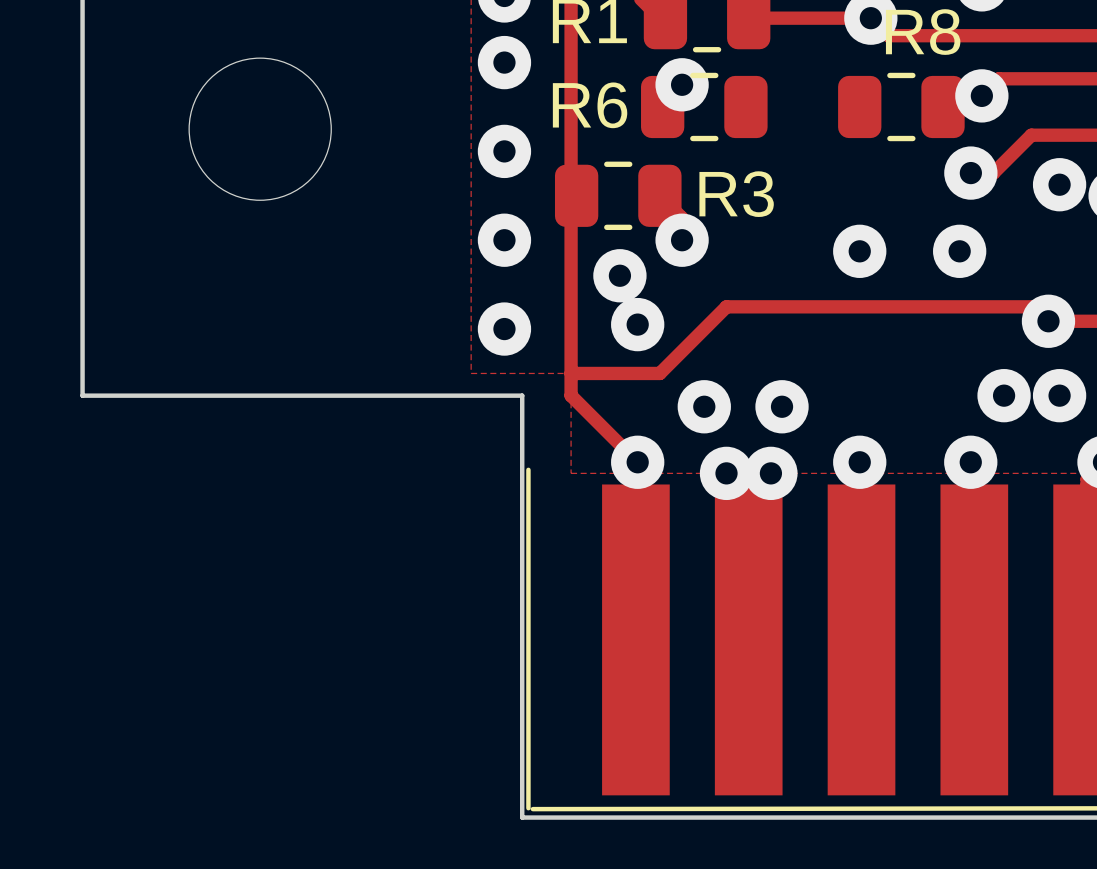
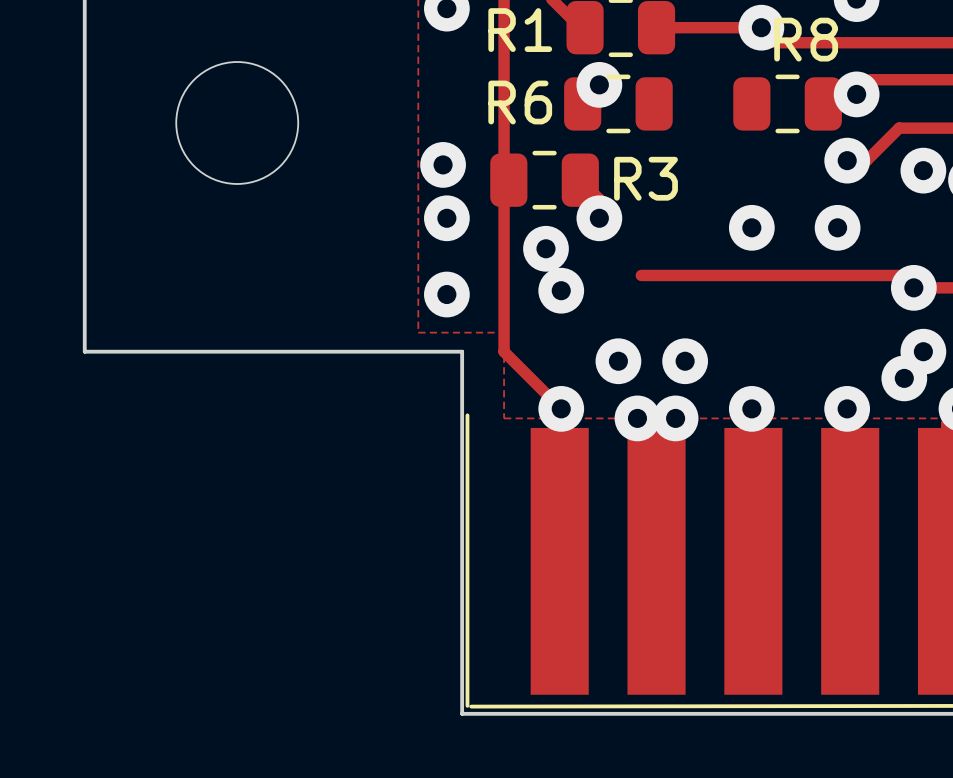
via: (504, 62) -> none
via position: (504, 151) -> (443, 164)
track: (730, 306) (726, 306) (659, 373) (571, 373) -> none
via position: (1004, 395) -> (904, 378)

